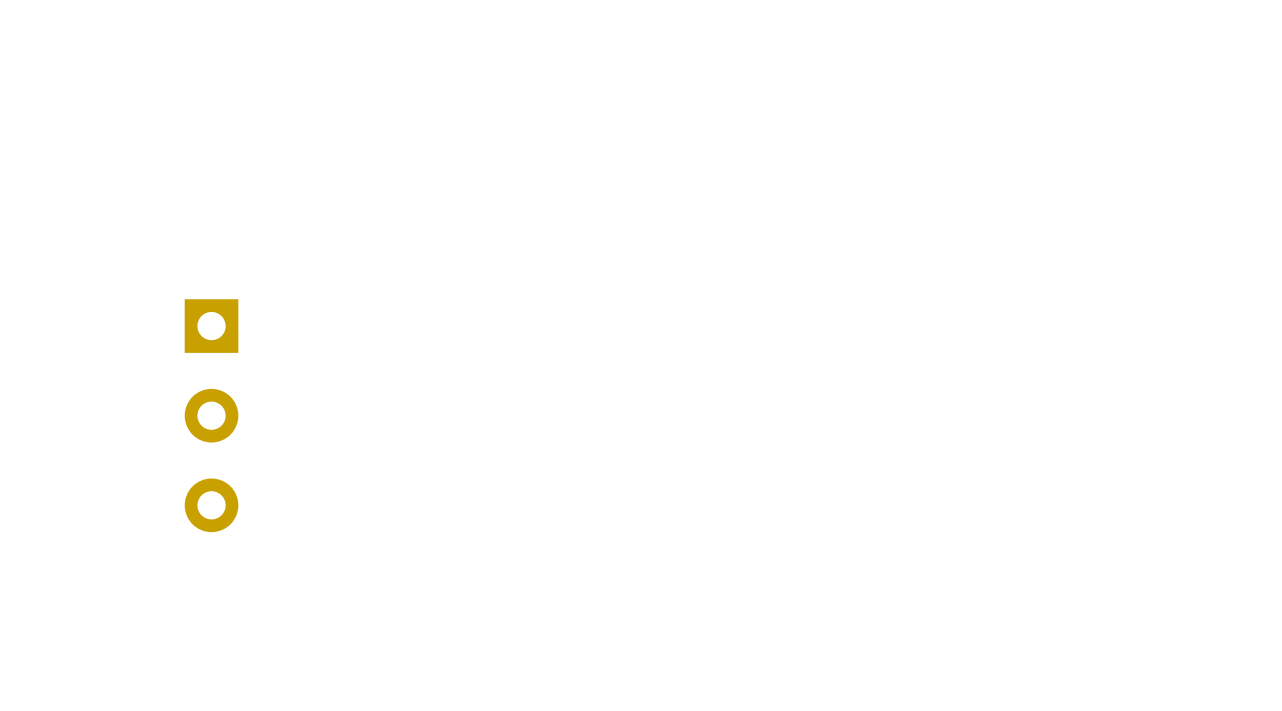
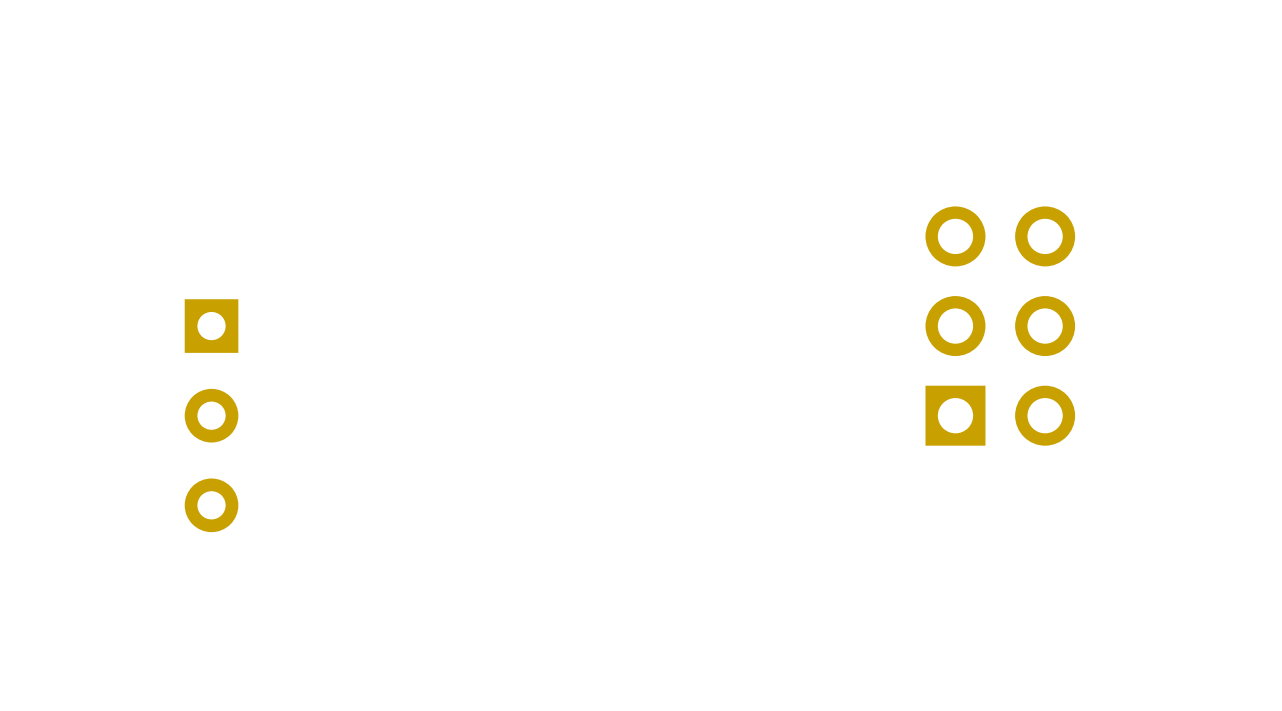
part: none -> (1000, 326)

